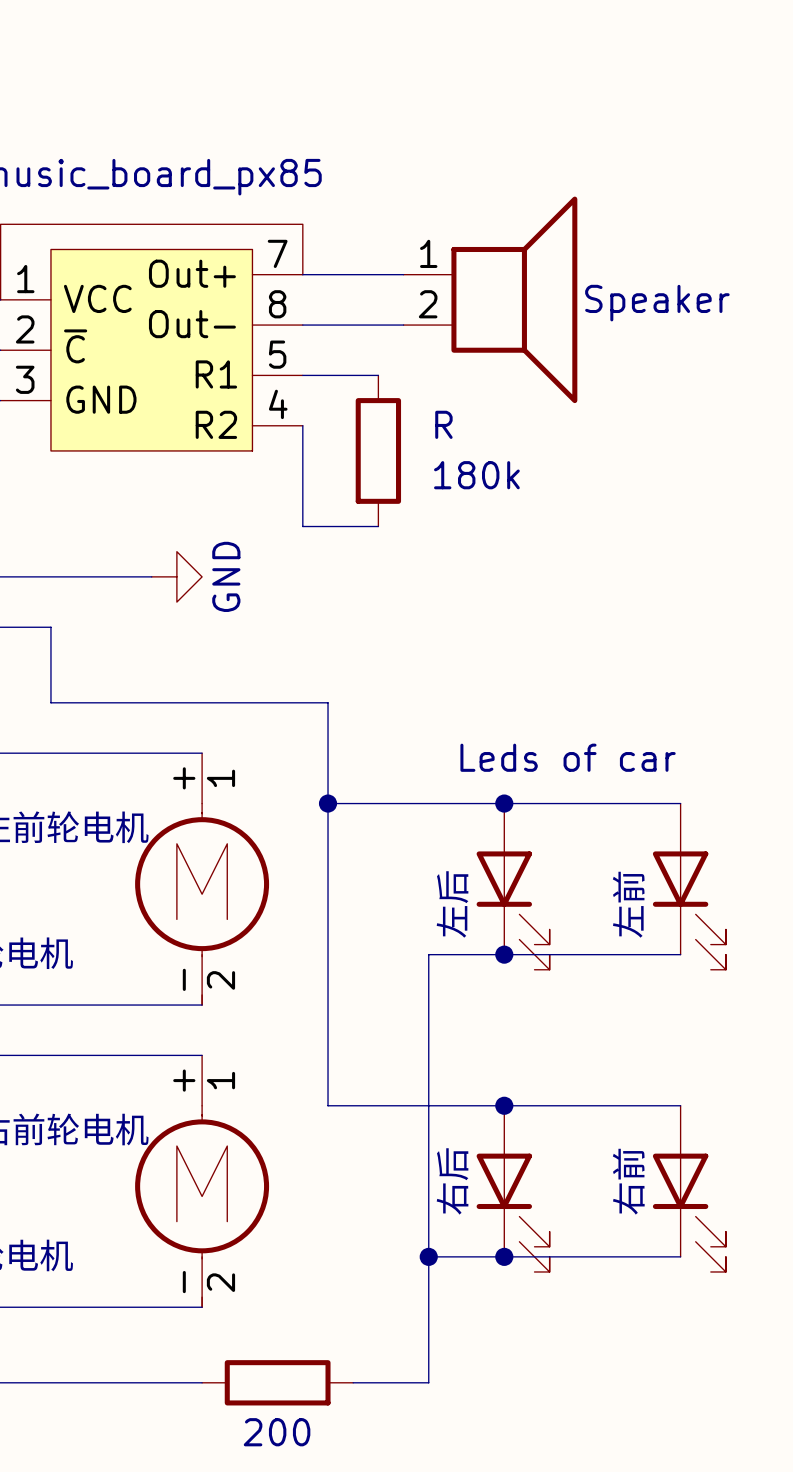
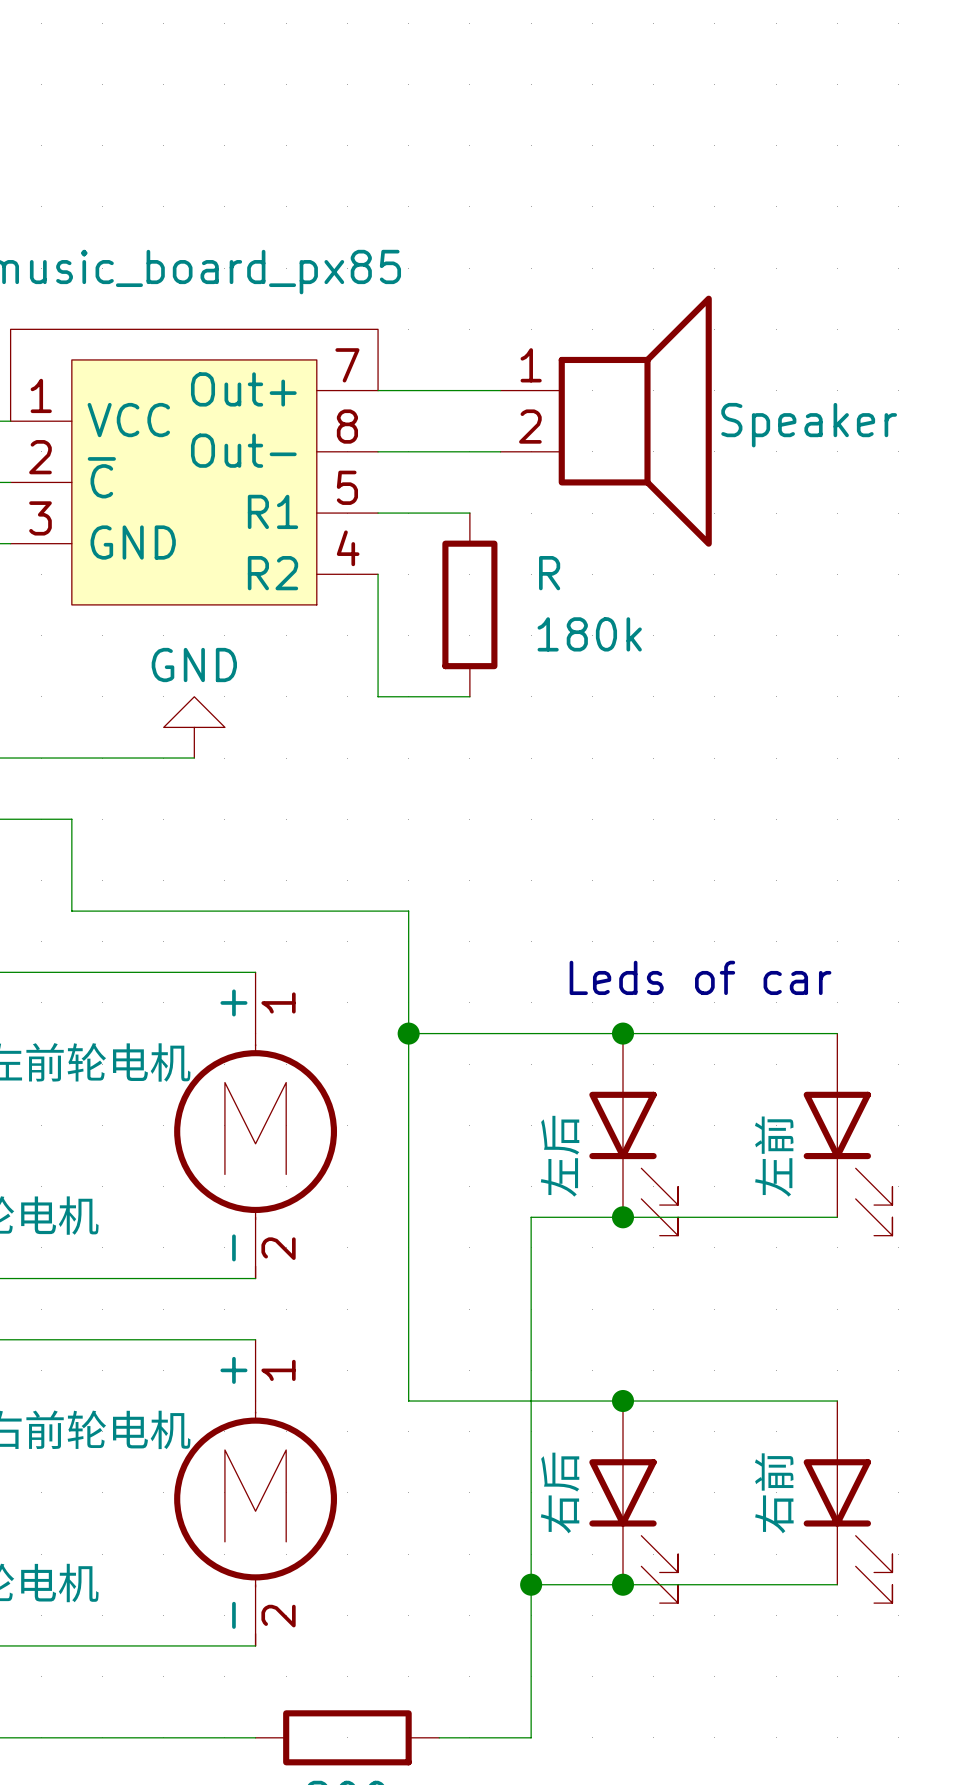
power symbol rotation: 0° (176, 576) -> 90° counterclockwise (194, 727)
power symbol position: GND (176, 576) -> GND (194, 727)

